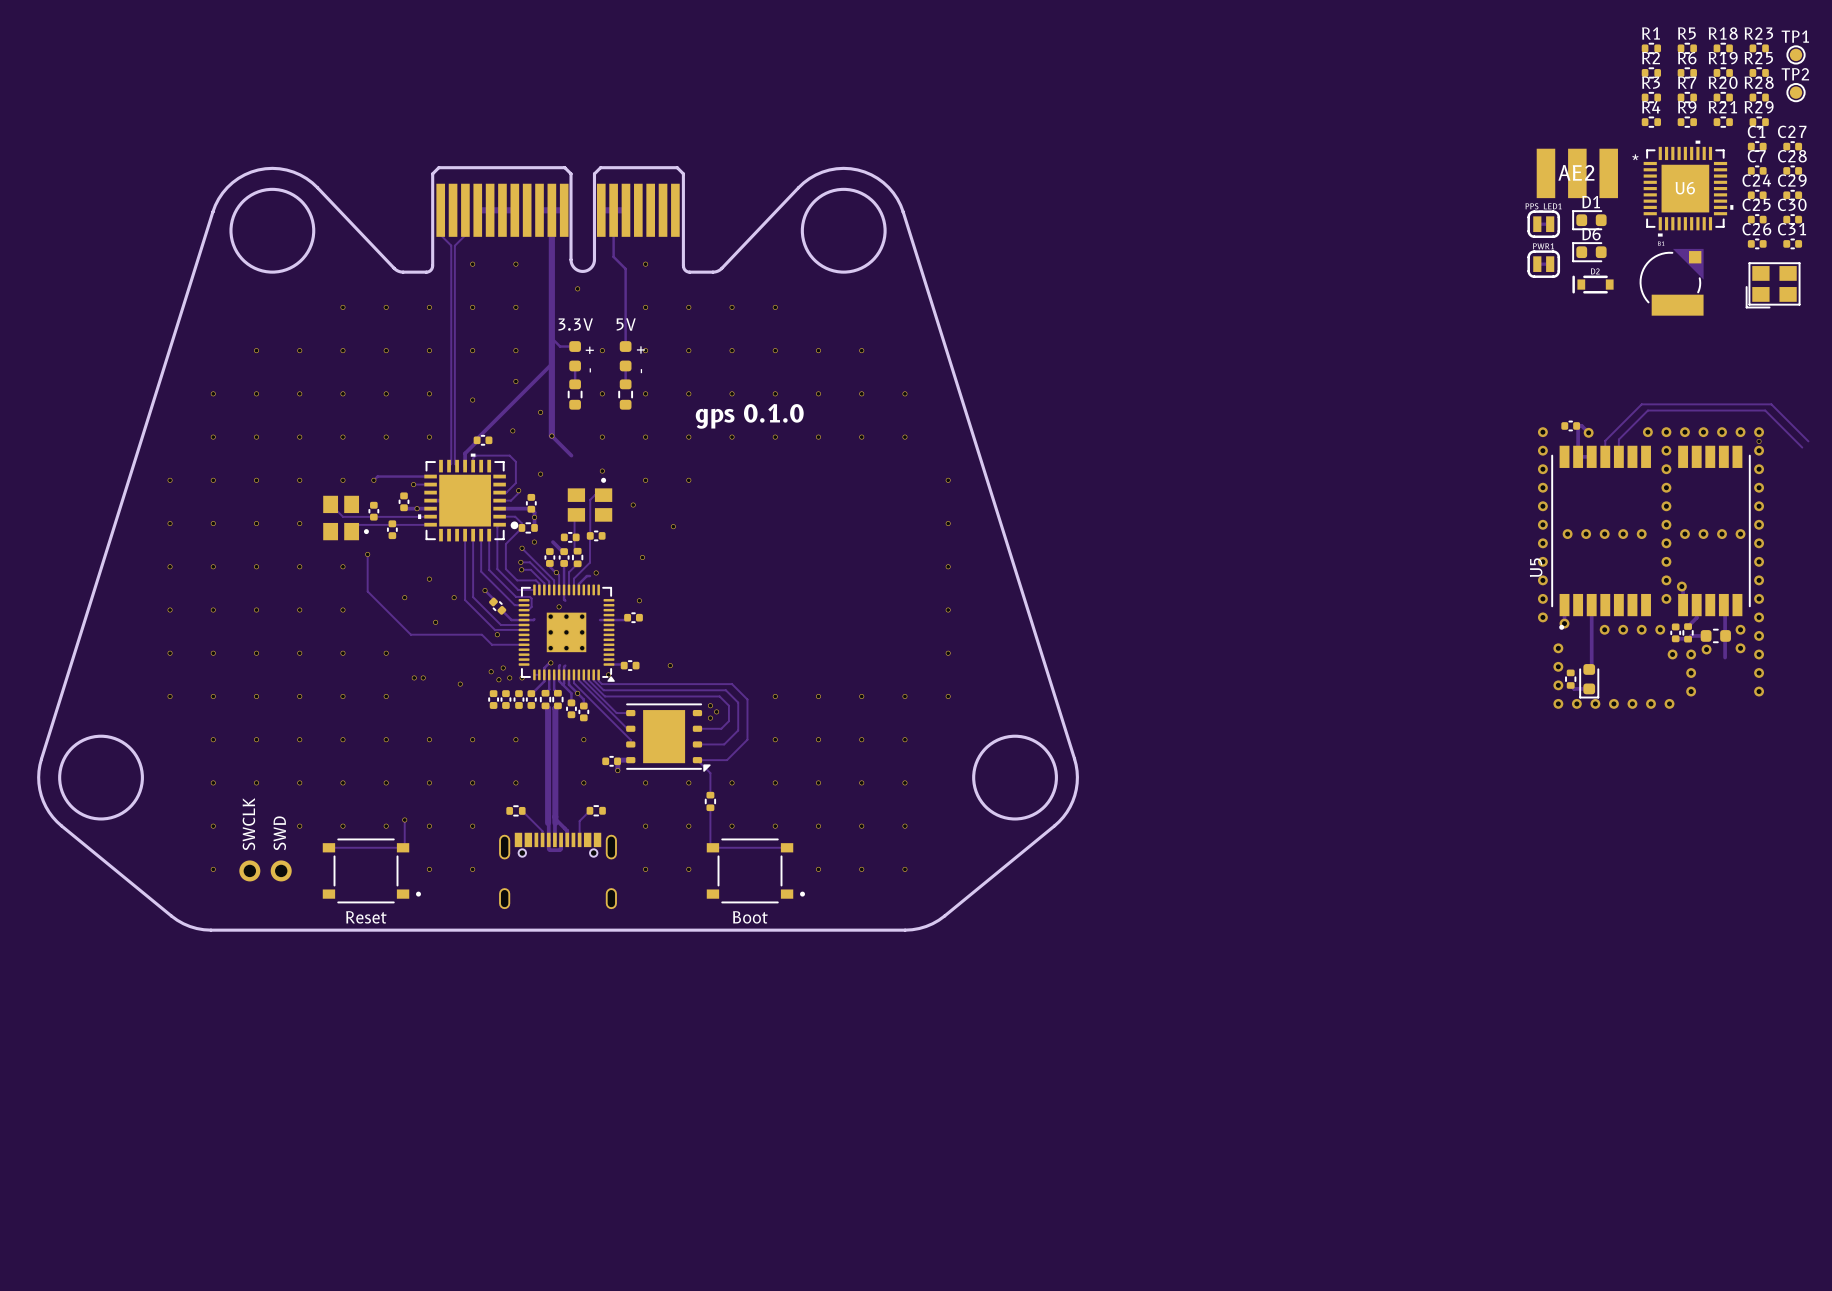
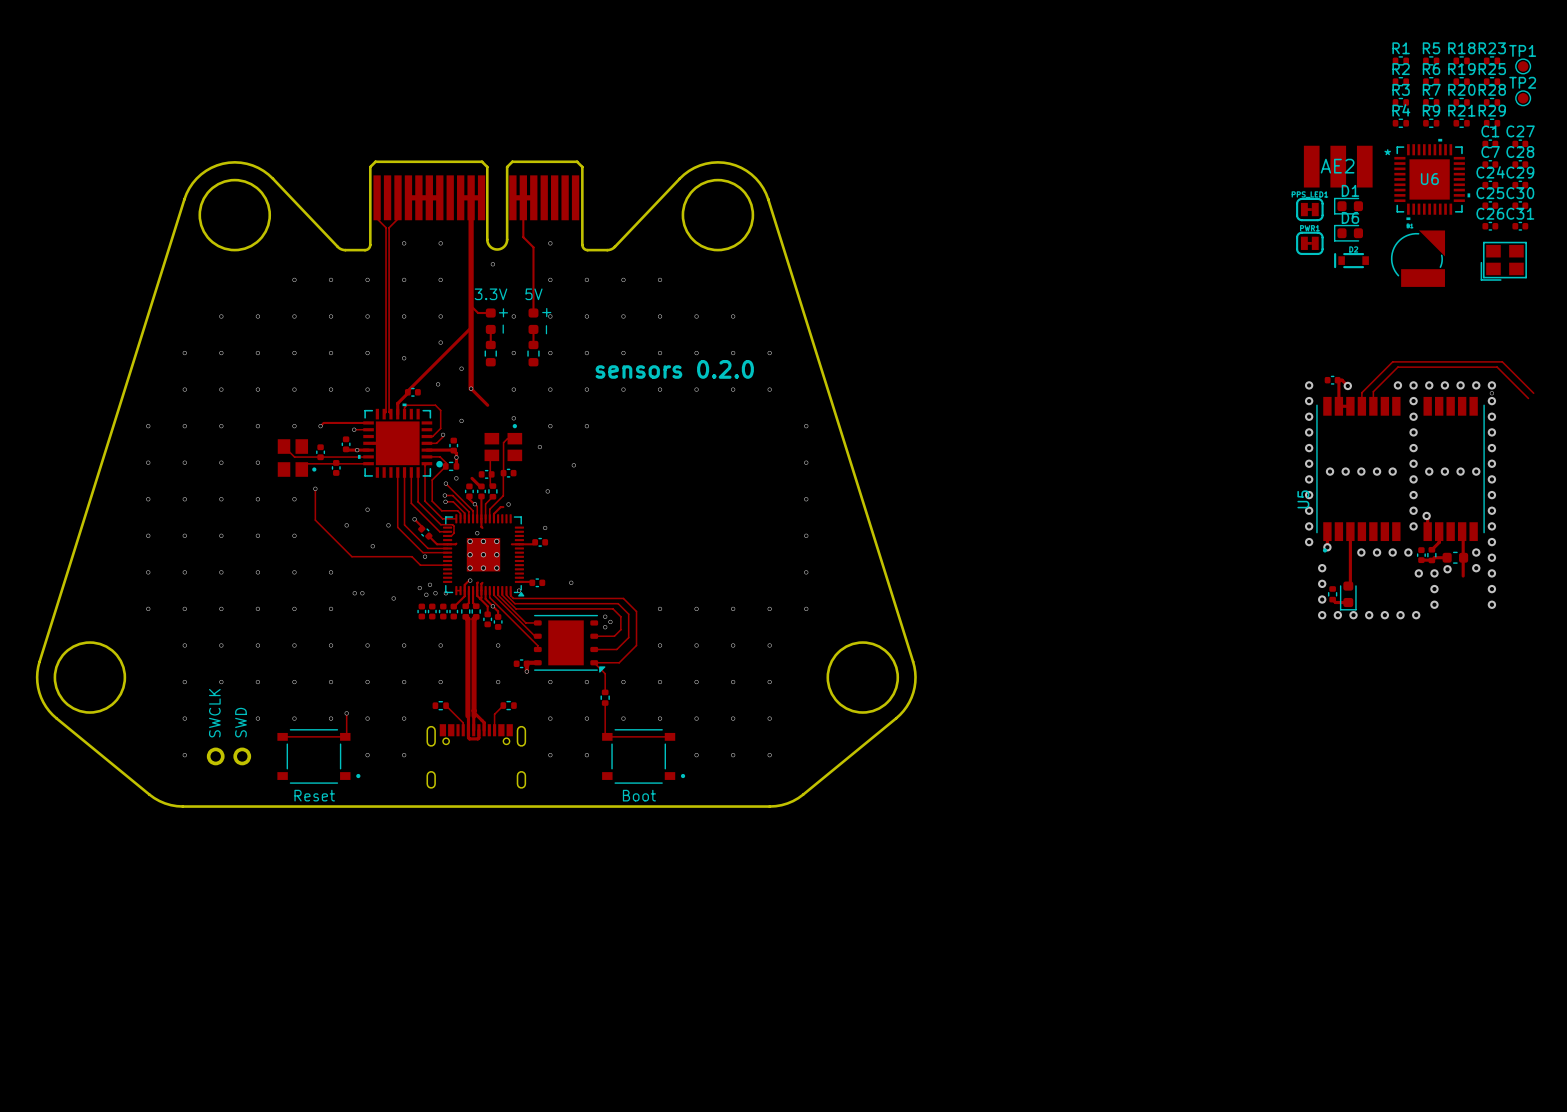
text: gps 0.1.0 (749, 416) -> sensors 0.2.0 (674, 369)

